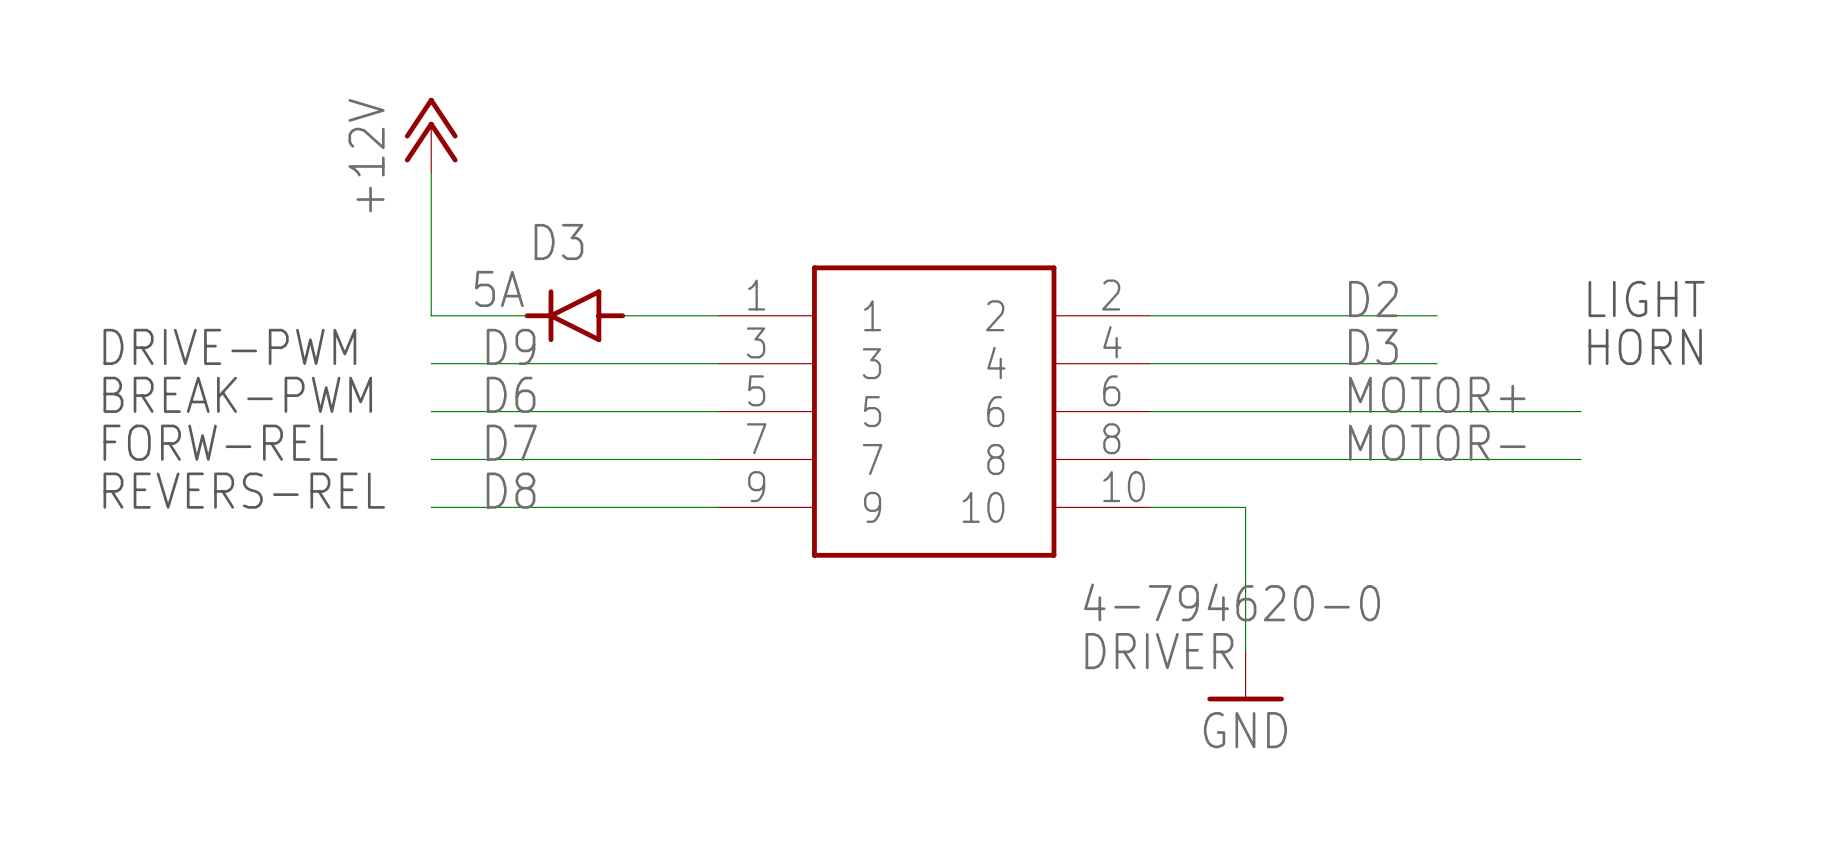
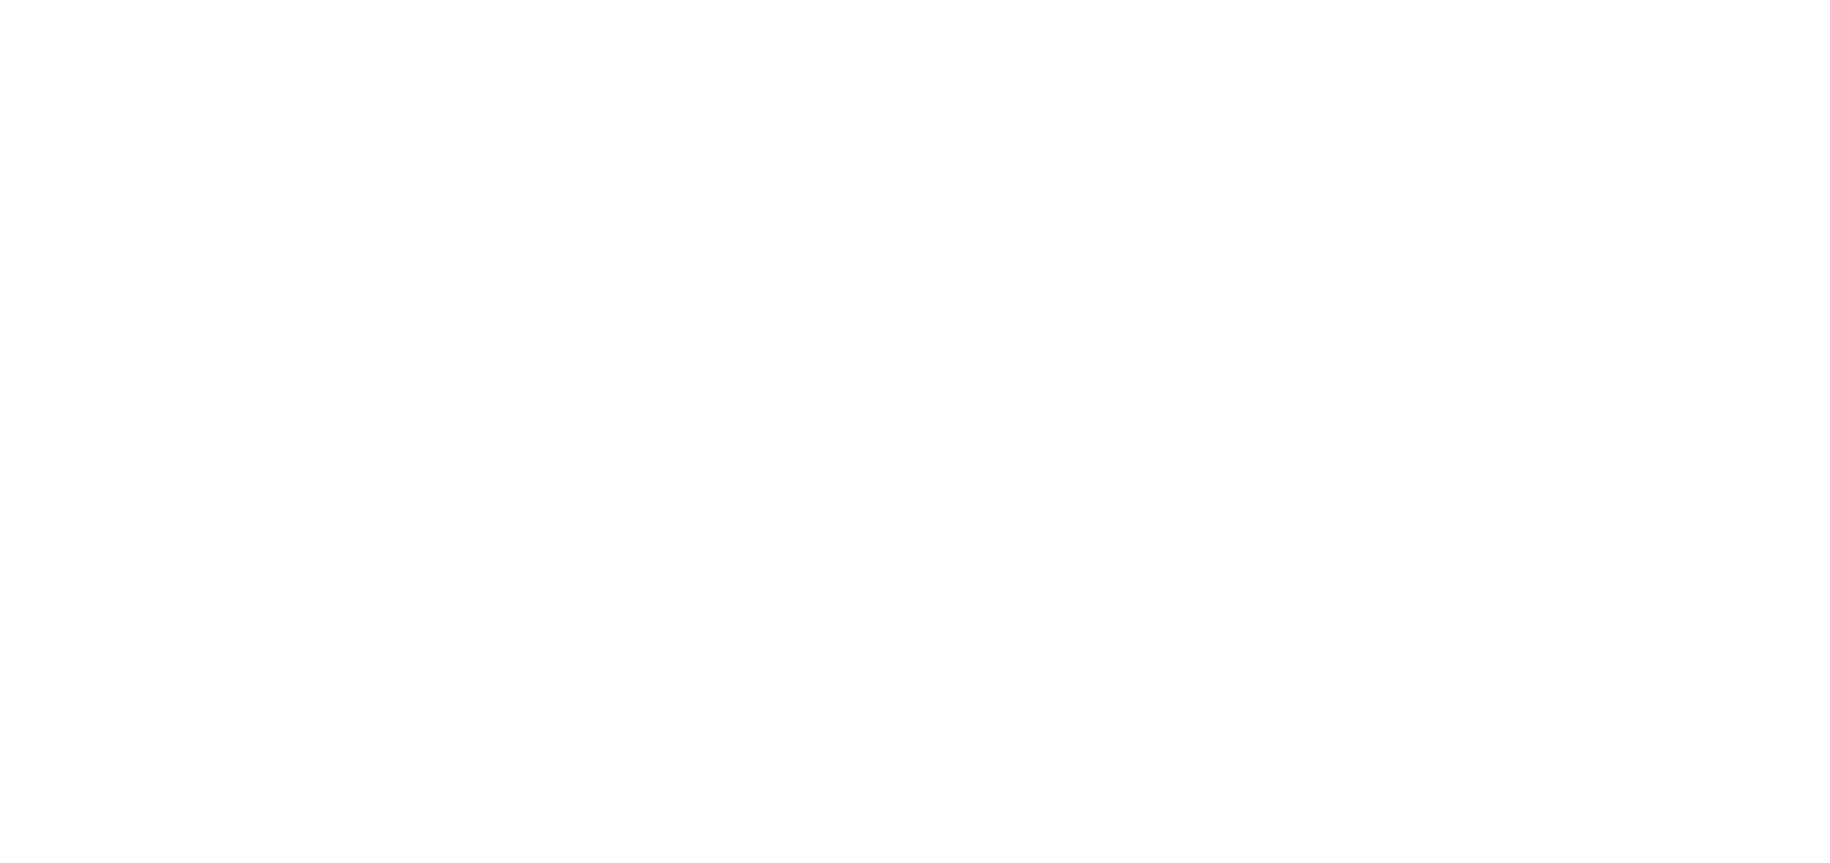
power symbol: +12V (431, 134) -> none
wire: (431, 172) (431, 315) (527, 315) -> none
label: D2 (1373, 299) -> none
text: LIGHT (1646, 299) -> none
D3: 5A (574, 315) -> none
wire: (622, 315) (718, 315) -> none
wire: (1149, 315) (1437, 315) -> none
text: DRIVE-PWM (229, 346) -> none
label: D9 (511, 346) -> none
label: D3 (1373, 346) -> none
text: HORN (1645, 346) -> none
wire: (431, 363) (718, 363) -> none
wire: (1149, 363) (1437, 363) -> none
text: BREAK-PWM (237, 394) -> none
label: D6 (511, 394) -> none
label: MOTOR+ (1437, 394) -> none
wire: (431, 411) (718, 411) -> none
DRIVER: 4-794620-0 (934, 411) -> none
wire: (1149, 411) (1580, 411) -> none
text: FORW-REL (220, 442) -> none
label: D7 (511, 442) -> none
label: MOTOR- (1437, 442) -> none
wire: (431, 459) (718, 459) -> none
wire: (1149, 459) (1580, 459) -> none
text: REVERS-REL (244, 490) -> none
label: D8 (511, 490) -> none
wire: (431, 507) (718, 507) -> none
wire: (1149, 507) (1245, 507) (1245, 651) -> none
power symbol: GND (1245, 676) -> none

